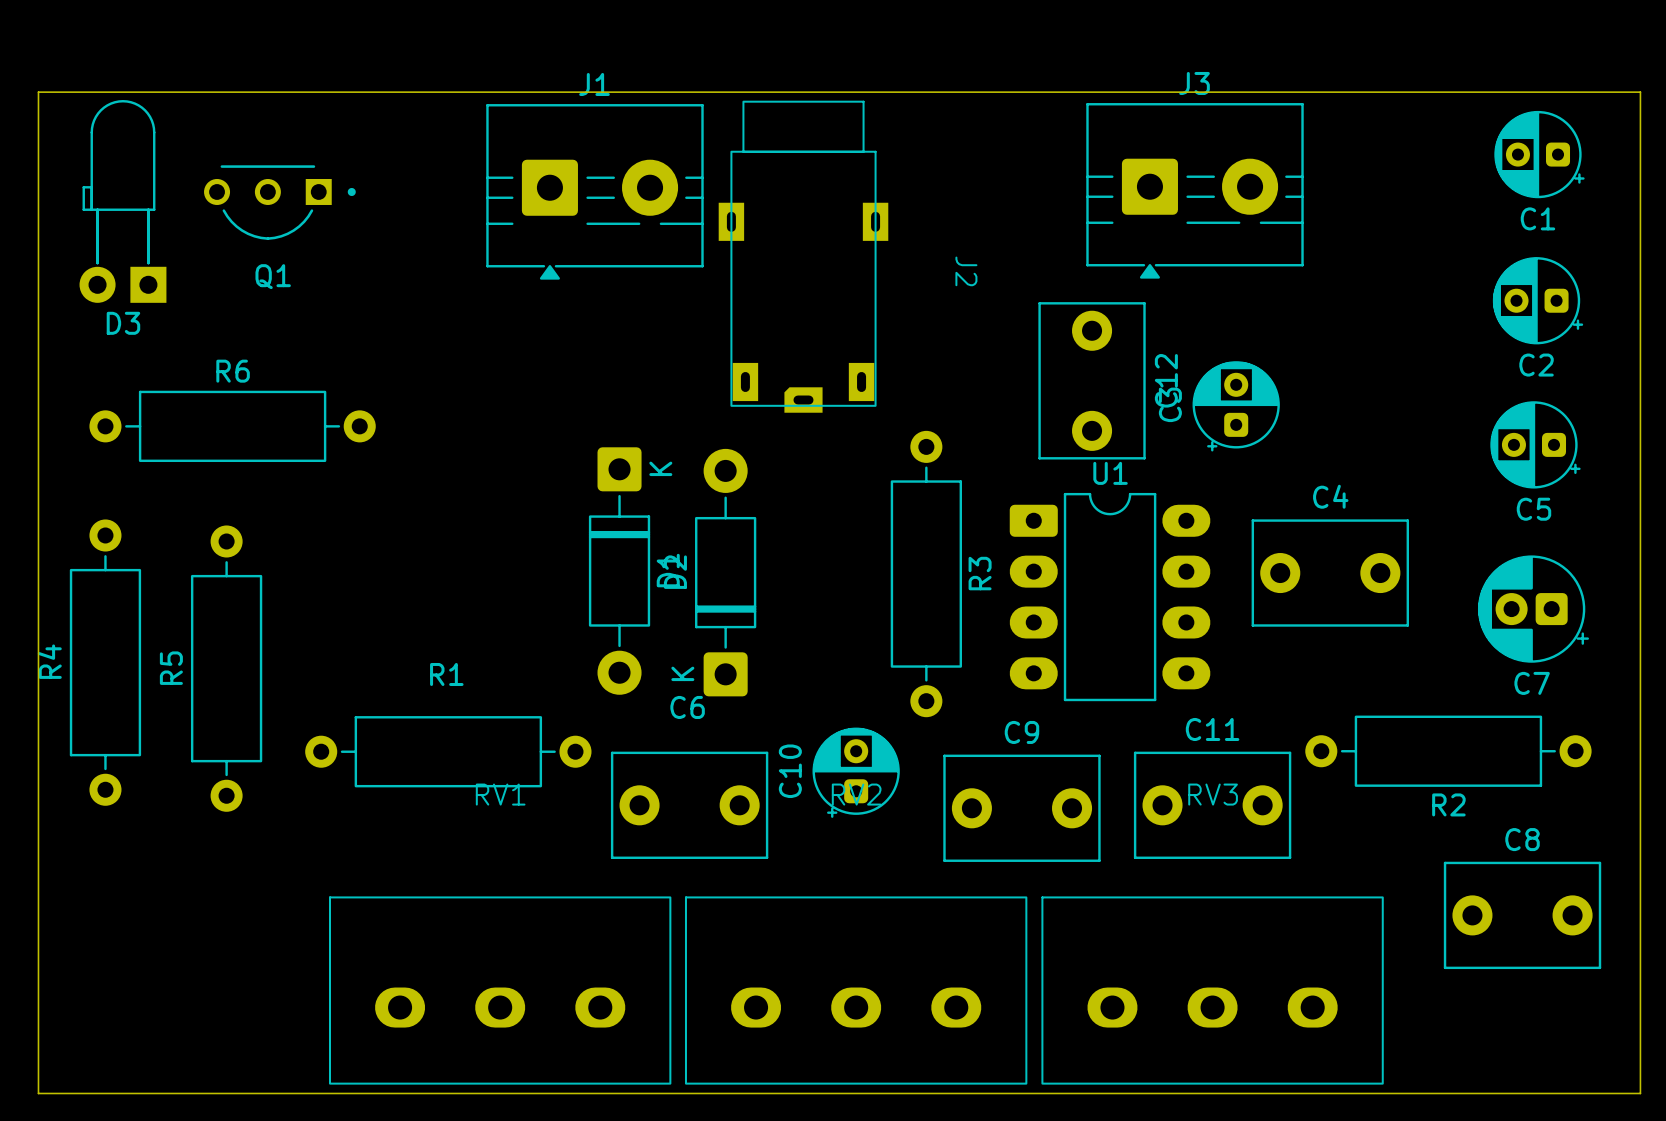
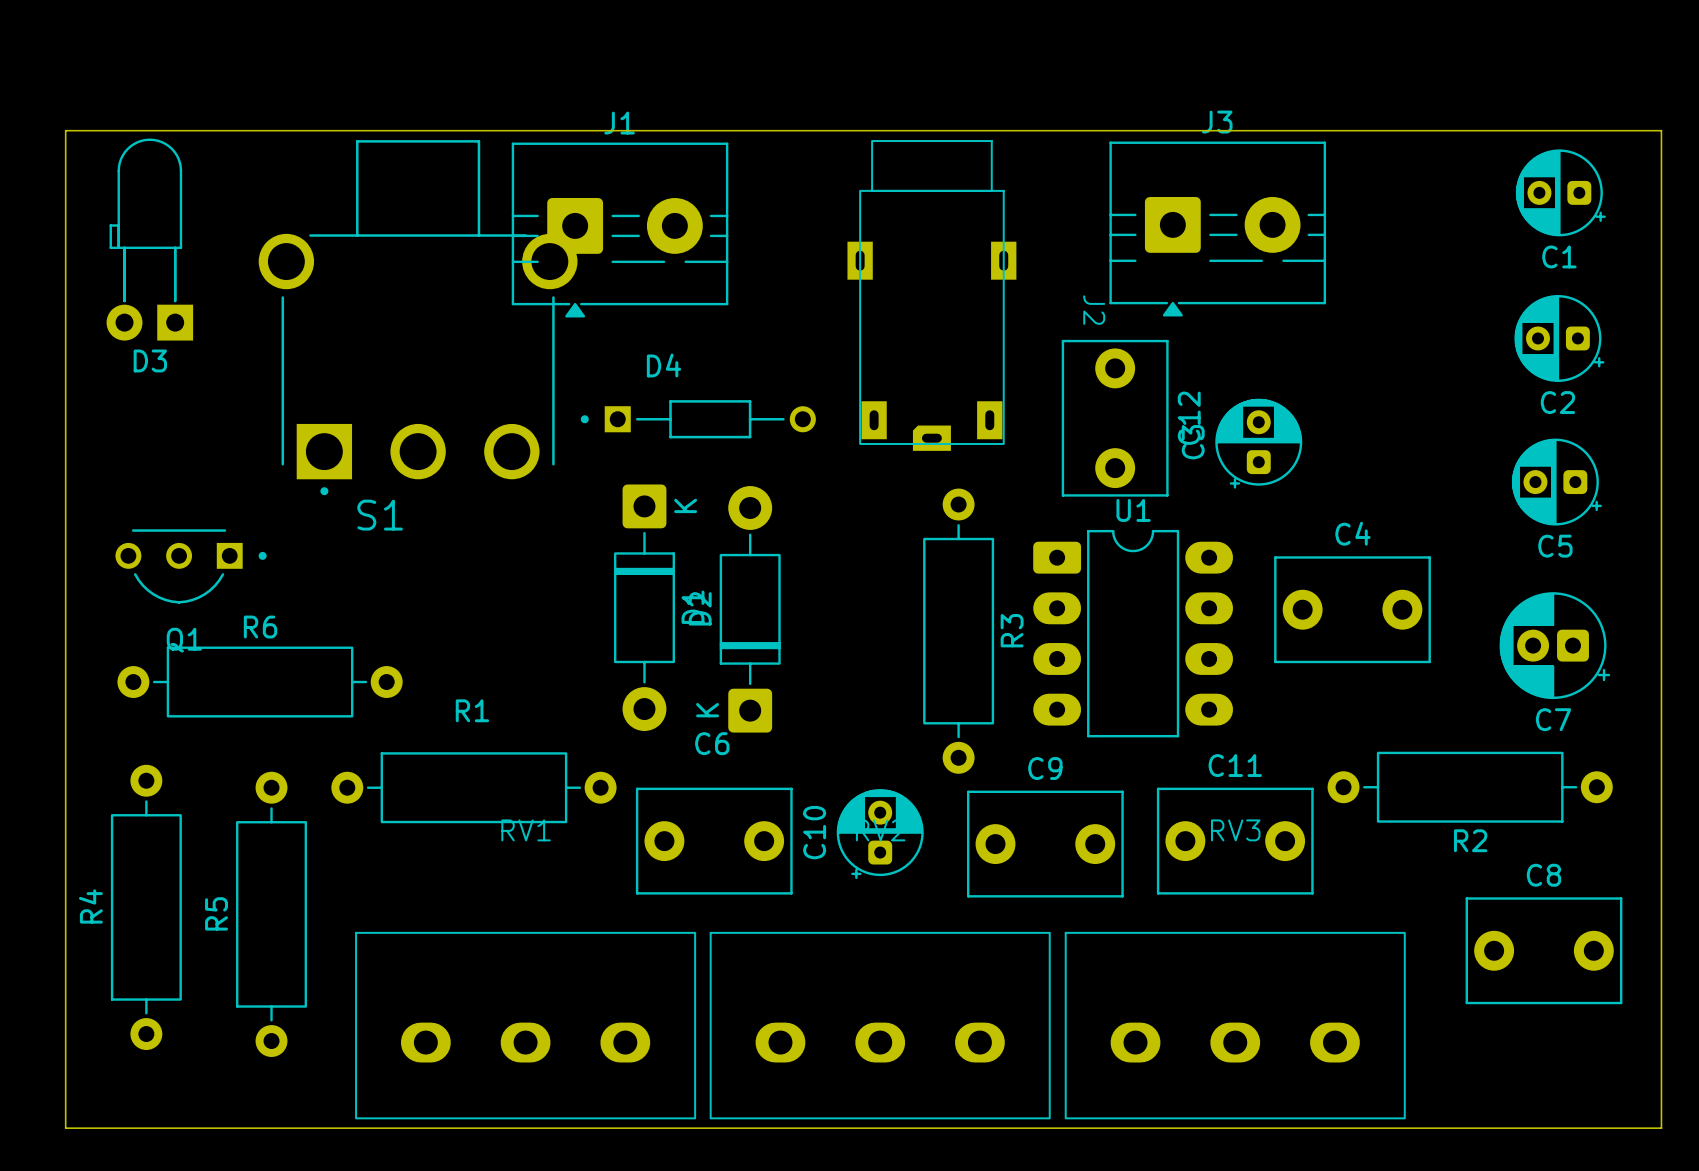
Q1 position: (279, 202) -> (191, 566)
J2 position: (803, 256) -> (931, 295)
S1: none -> (418, 317)
D4: none -> (698, 419)
R6 position: (232, 426) -> (260, 682)
R3 position: (926, 574) -> (958, 631)
R4 position: (105, 662) -> (146, 907)
R5 position: (226, 668) -> (271, 914)
C10 position: (856, 772) -> (880, 834)

